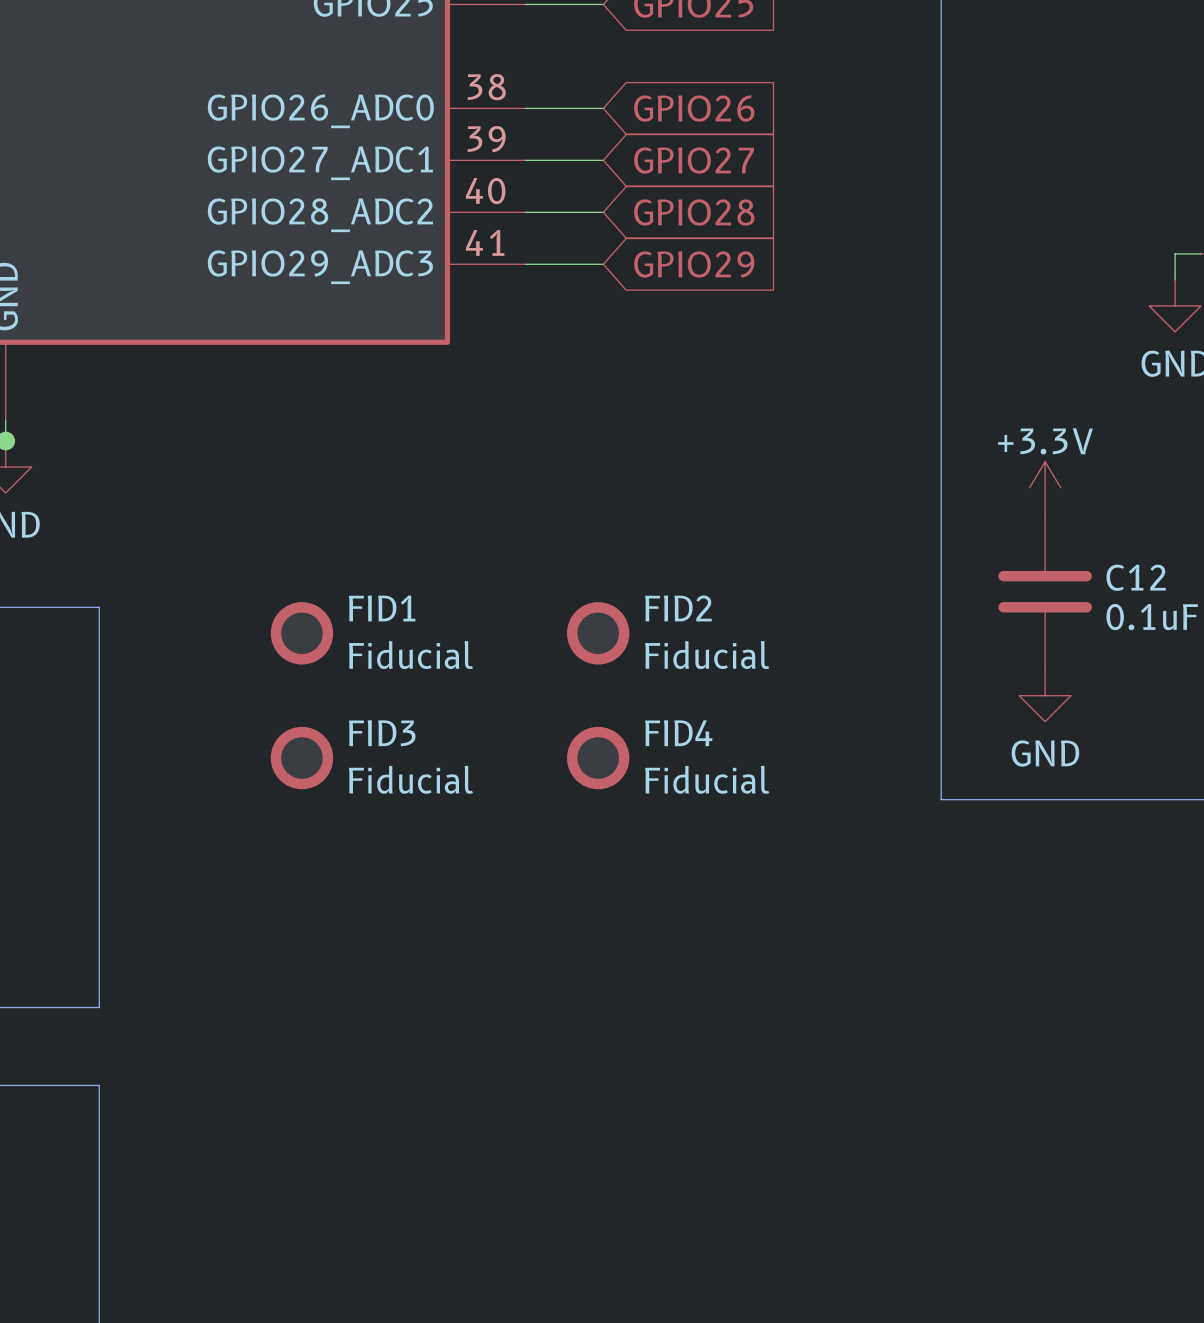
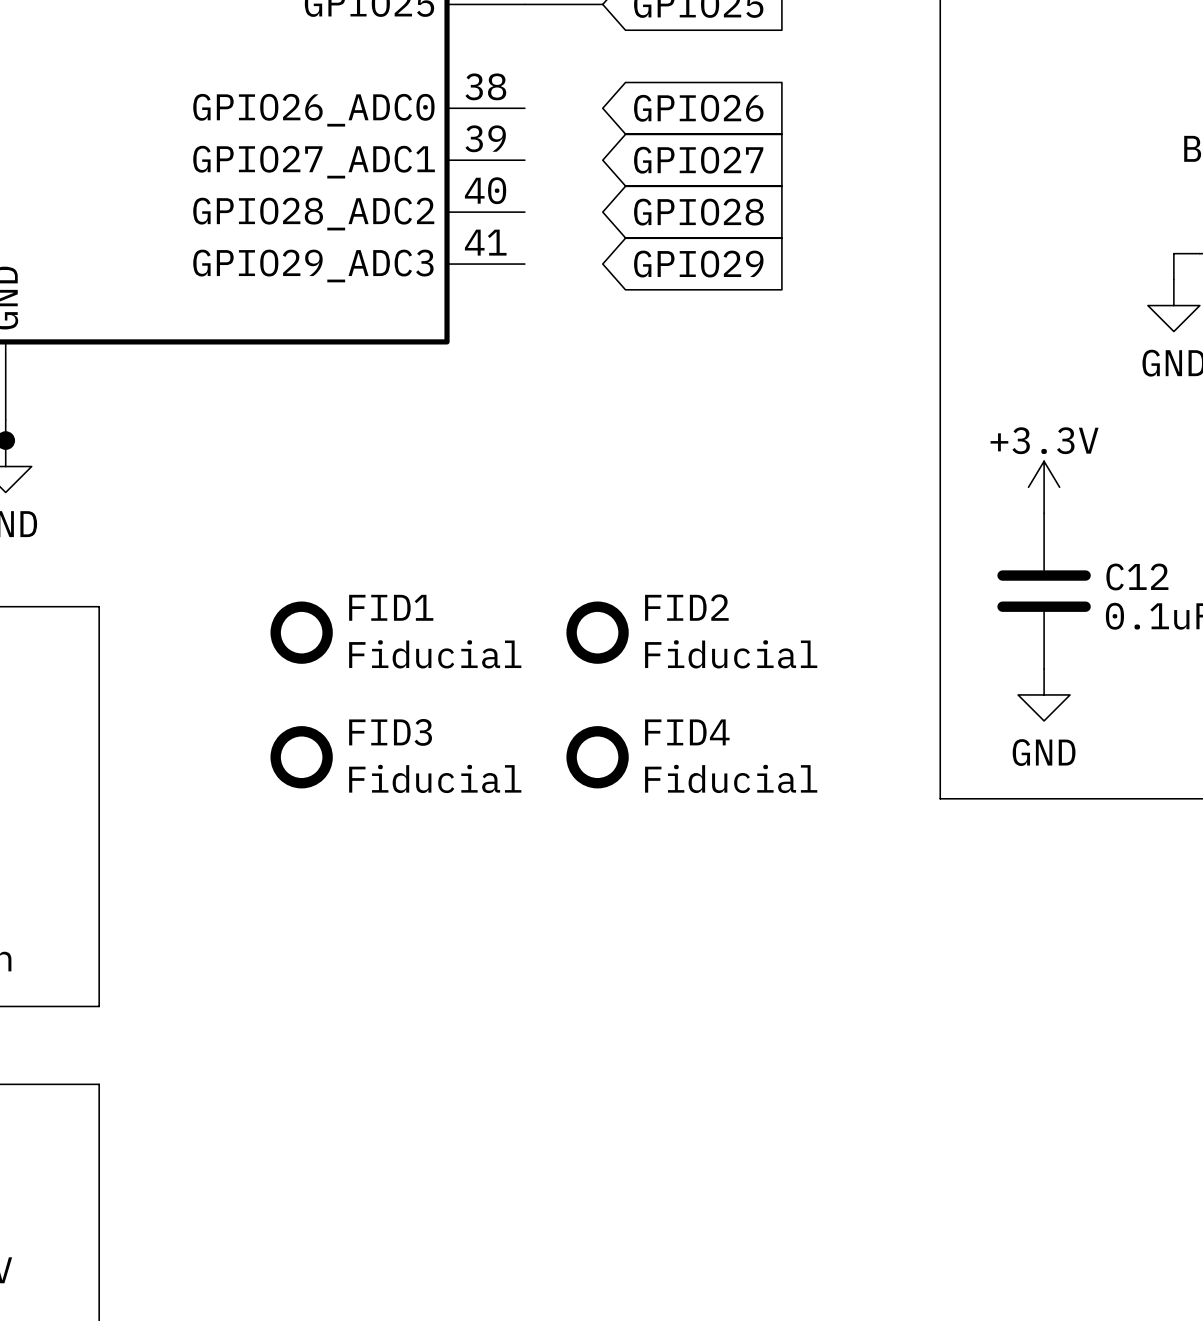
wire: (525, 108) (603, 108) -> none
wire: (525, 160) (603, 160) -> none
wire: (525, 212) (603, 212) -> none
wire: (525, 264) (603, 264) -> none

